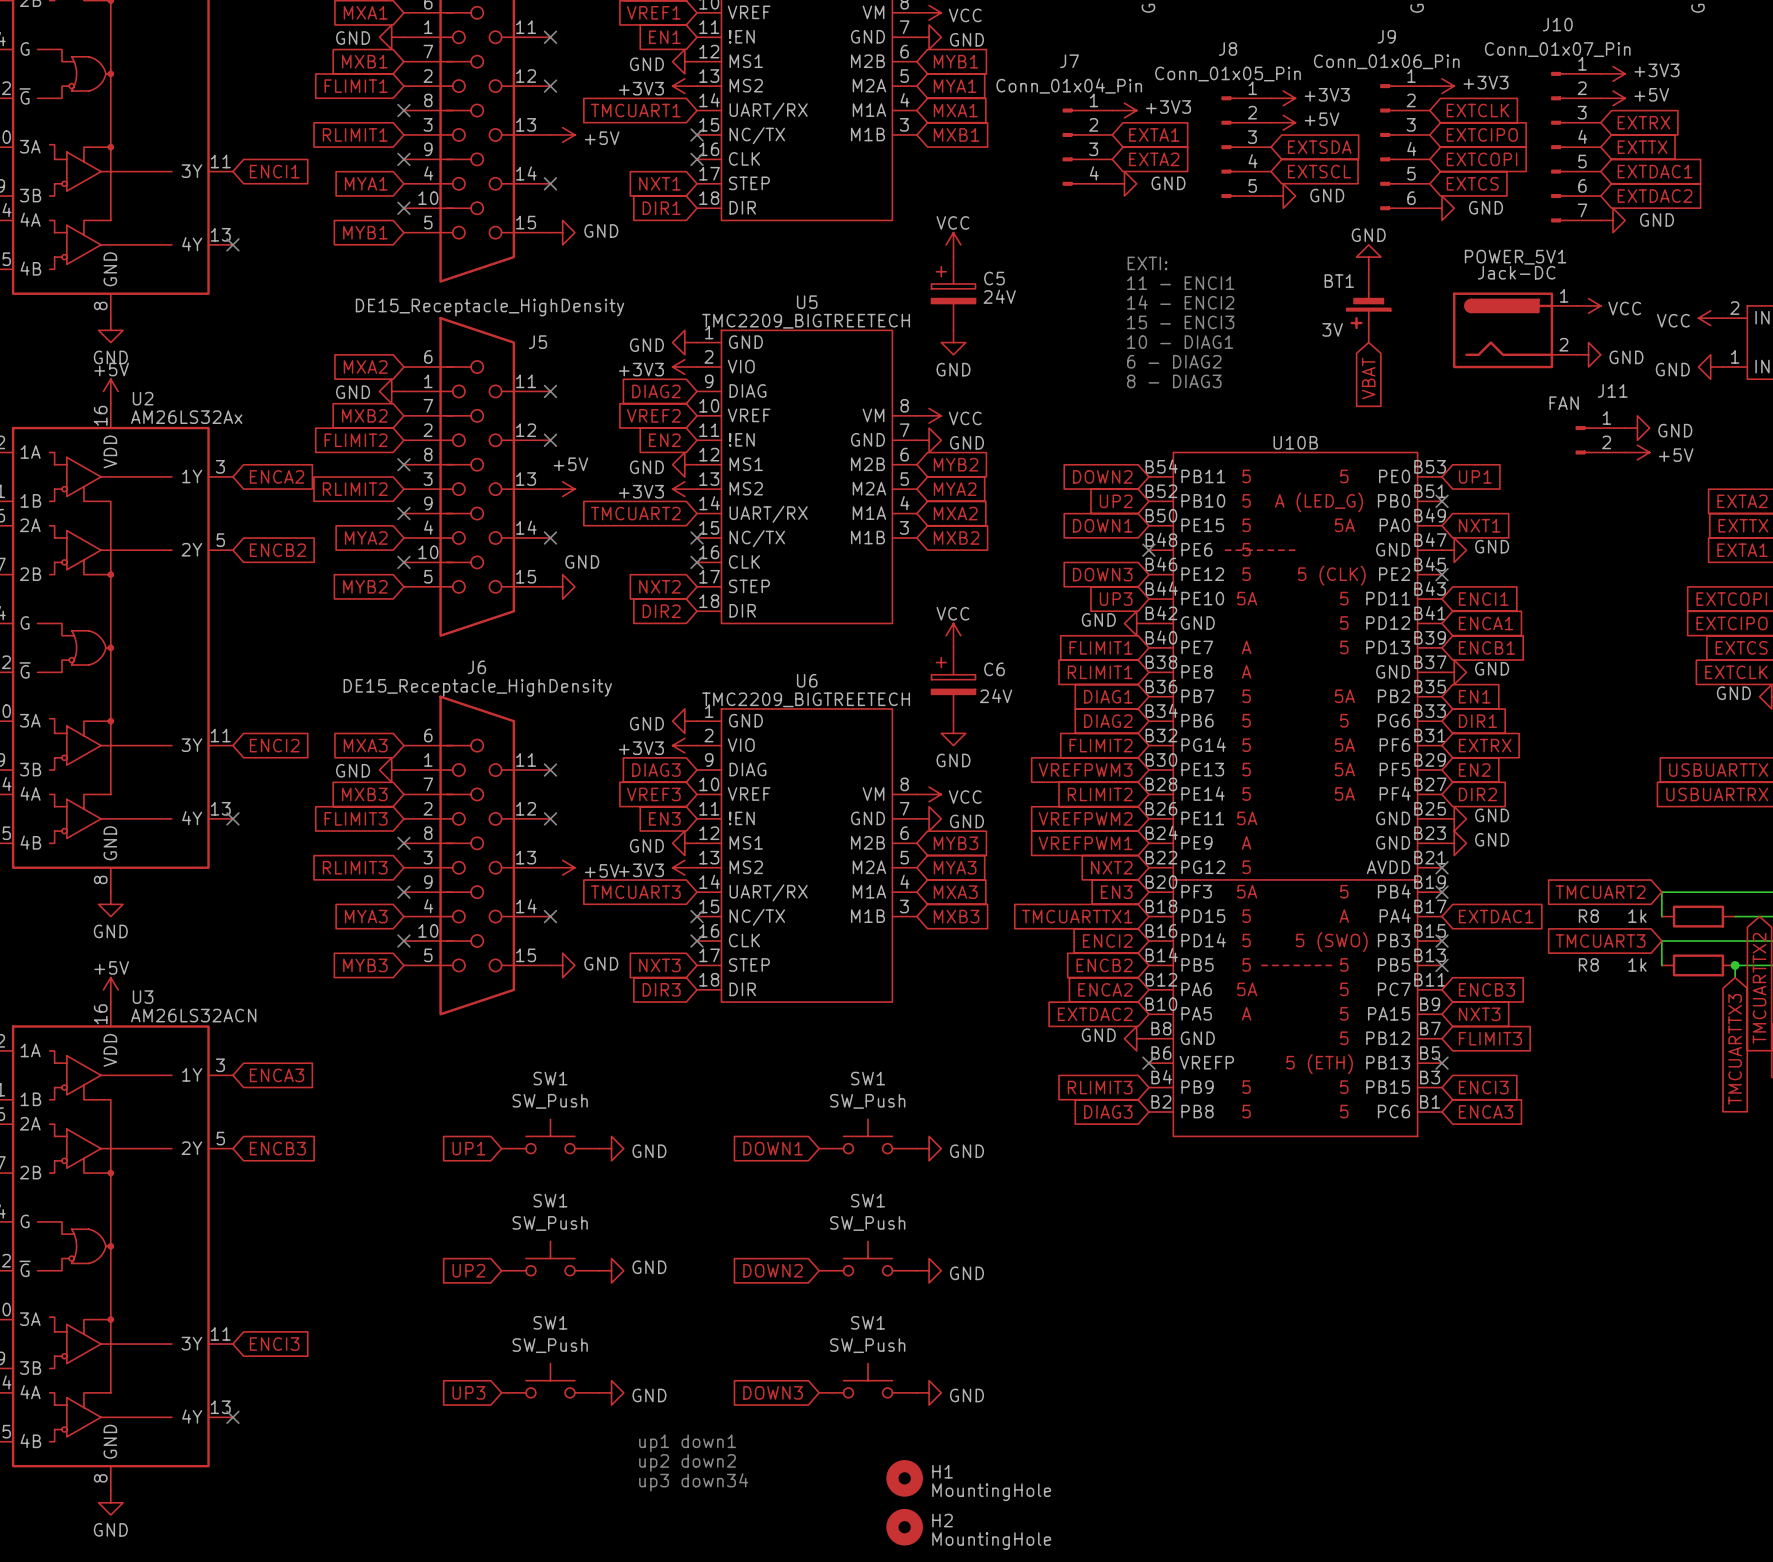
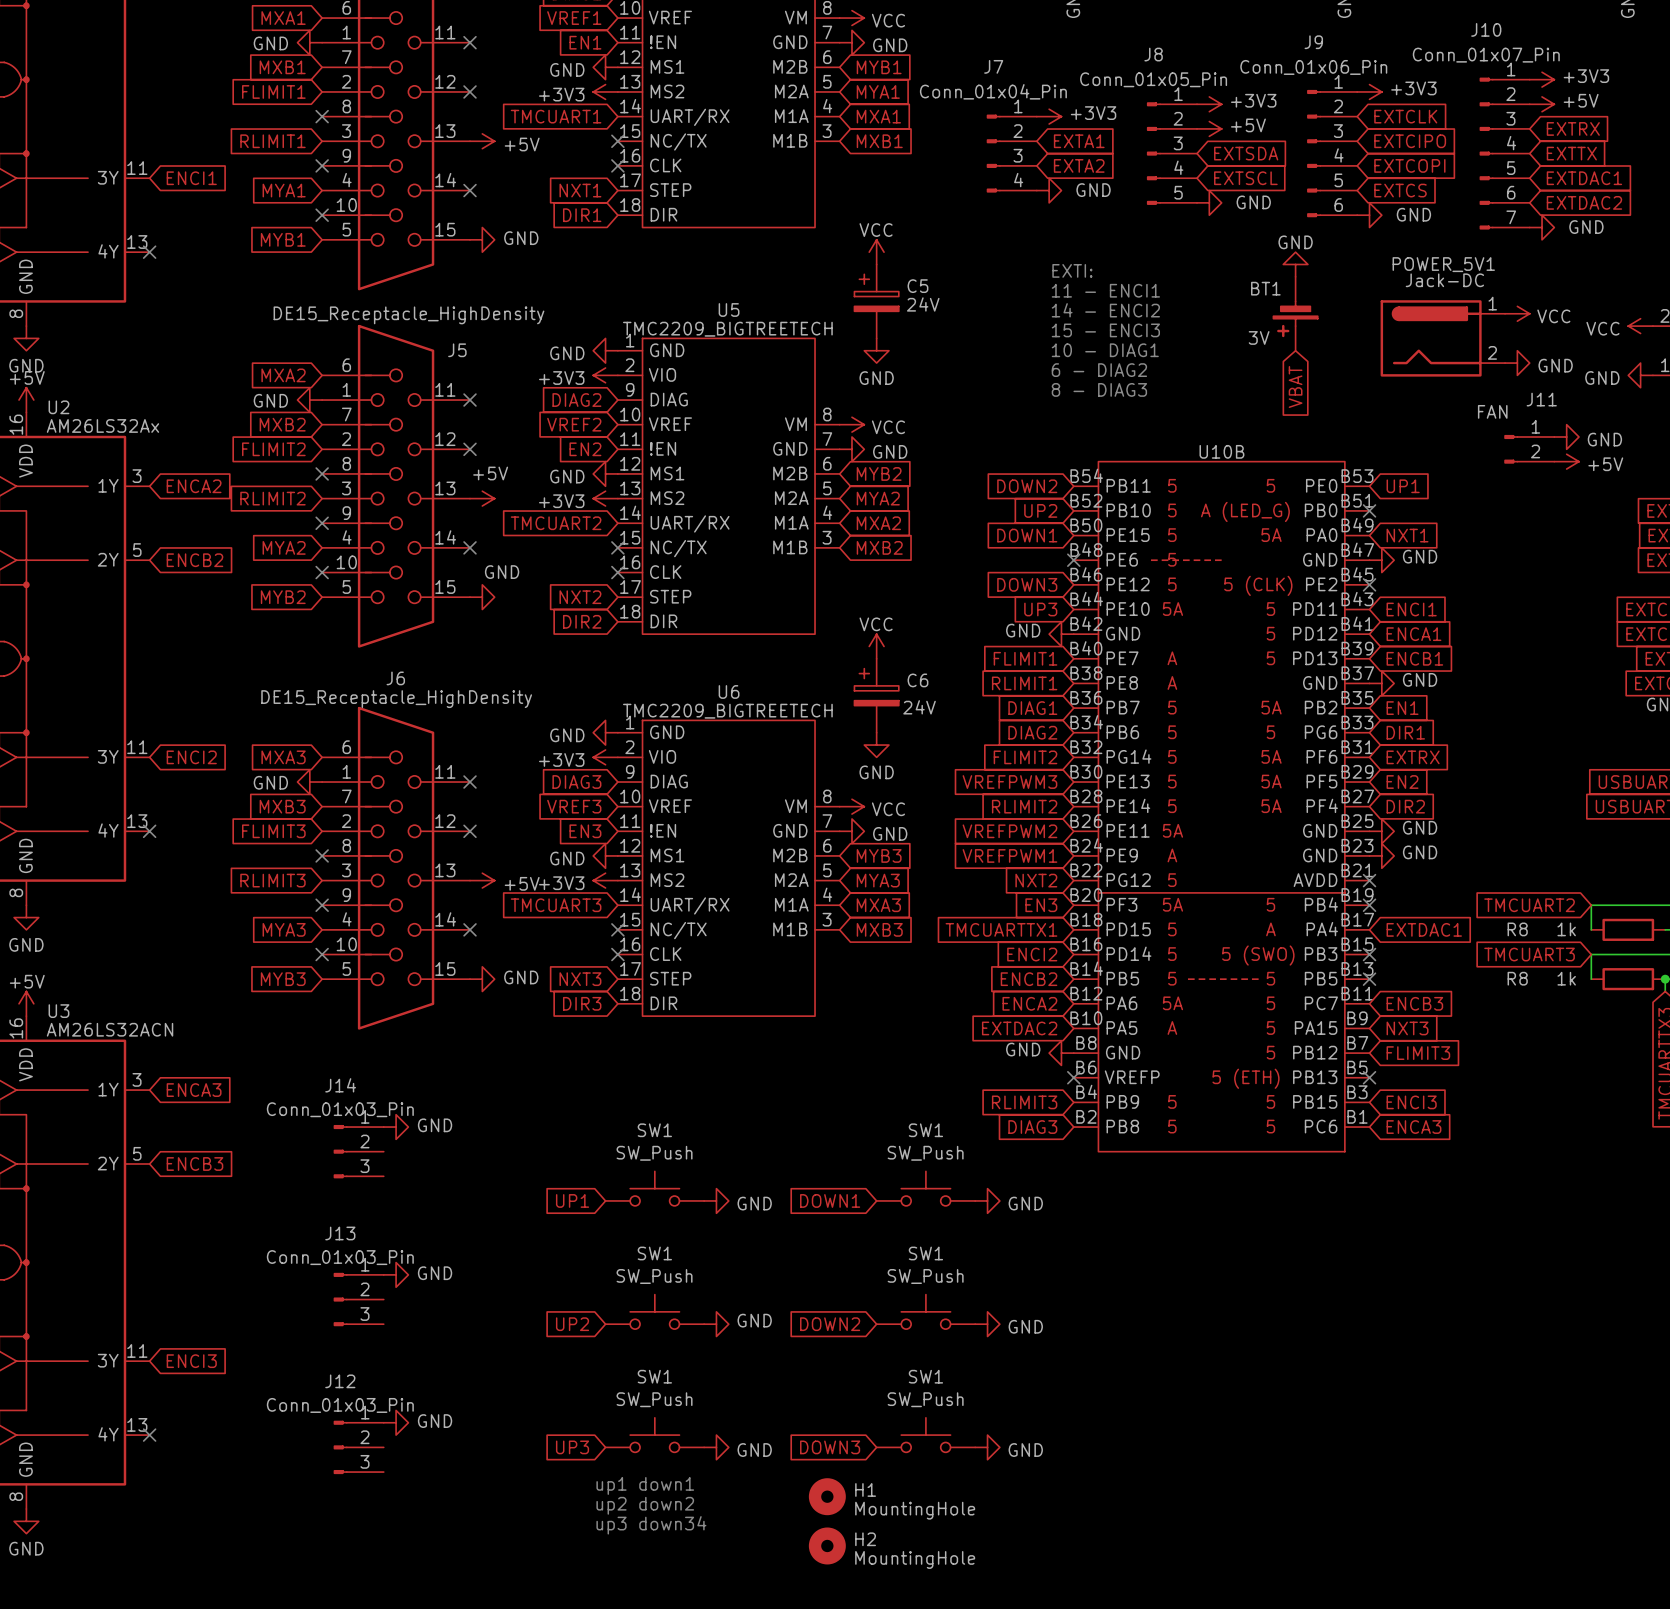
power symbol: none -> GND (396, 1127)
J14: none -> Conn_01x03_Pin (358, 1151)
SW1: SW_Push (550, 1136) -> none
SW1: SW_Push (868, 1136) -> none
global label position: UP1 (468, 1148) -> UP1 (572, 1200)
power symbol: GND (611, 1148) -> none
global label position: DOWN1 (773, 1148) -> DOWN1 (830, 1200)
power symbol: GND (929, 1148) -> none
SW1: none -> SW_Push (654, 1188)
SW1: none -> SW_Push (925, 1188)
power symbol: none -> GND (716, 1200)
power symbol: none -> GND (987, 1200)
power symbol: none -> GND (396, 1274)
SW1: SW_Push (550, 1258) -> none
SW1: SW_Push (868, 1258) -> none
global label position: UP2 (468, 1270) -> UP2 (572, 1324)
power symbol: GND (611, 1270) -> none
global label position: DOWN2 (773, 1270) -> DOWN2 (830, 1324)
power symbol: GND (929, 1270) -> none
J13: none -> Conn_01x03_Pin (358, 1299)
SW1: none -> SW_Push (654, 1311)
SW1: none -> SW_Push (925, 1311)
power symbol: none -> GND (716, 1324)
power symbol: none -> GND (987, 1324)
SW1: SW_Push (550, 1380) -> none
SW1: SW_Push (868, 1380) -> none
global label position: UP3 (468, 1392) -> UP3 (572, 1447)
power symbol: GND (611, 1392) -> none
global label position: DOWN3 (773, 1392) -> DOWN3 (830, 1447)
power symbol: GND (929, 1392) -> none
power symbol: none -> GND (396, 1422)
SW1: none -> SW_Push (654, 1435)
SW1: none -> SW_Push (925, 1435)
J12: none -> Conn_01x03_Pin (358, 1447)
power symbol: none -> GND (716, 1447)
power symbol: none -> GND (987, 1447)
text position: up1 down1 (687, 1443) -> up1 down1 (645, 1485)
text position: up2 down2 (687, 1462) -> up2 down2 (645, 1505)
text position: up3 down34 (693, 1482) -> up3 down34 (651, 1525)

